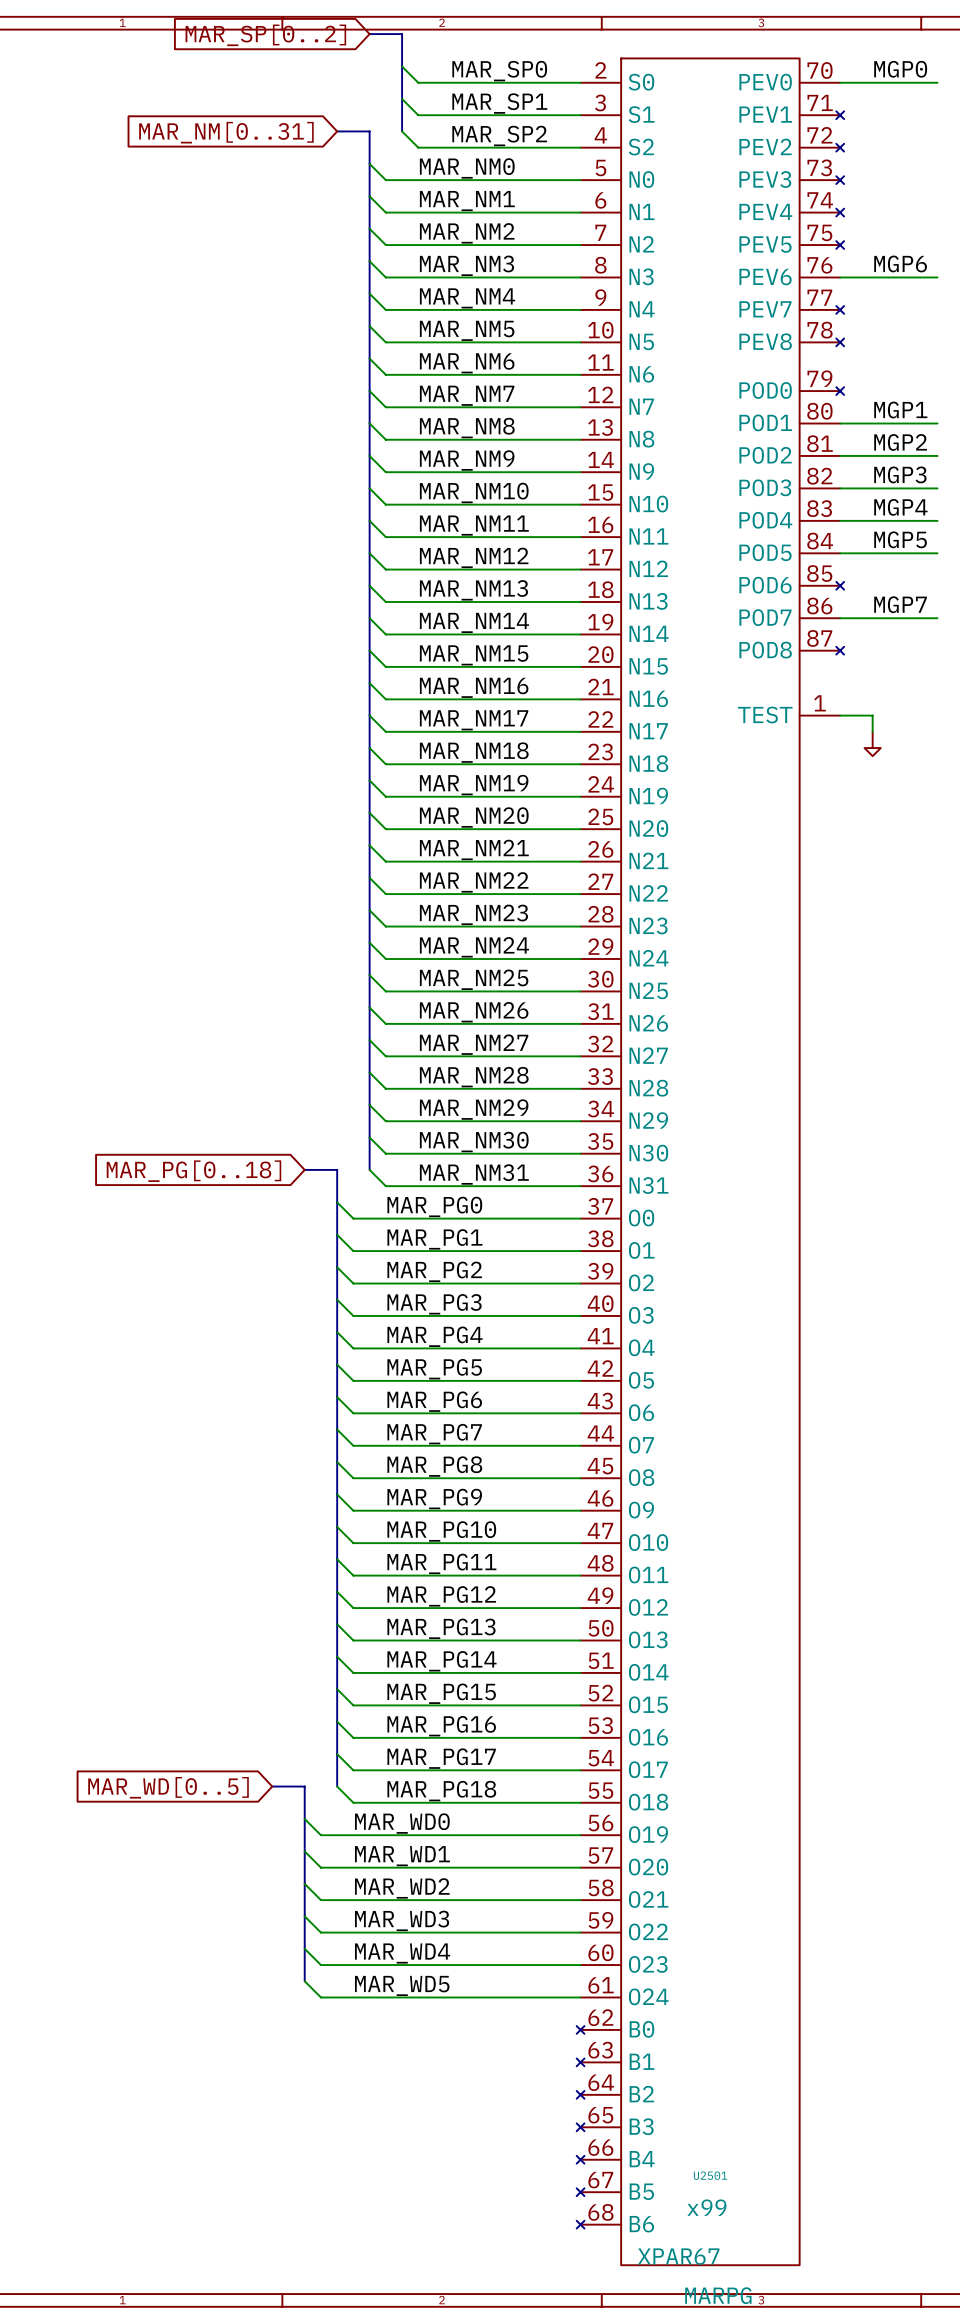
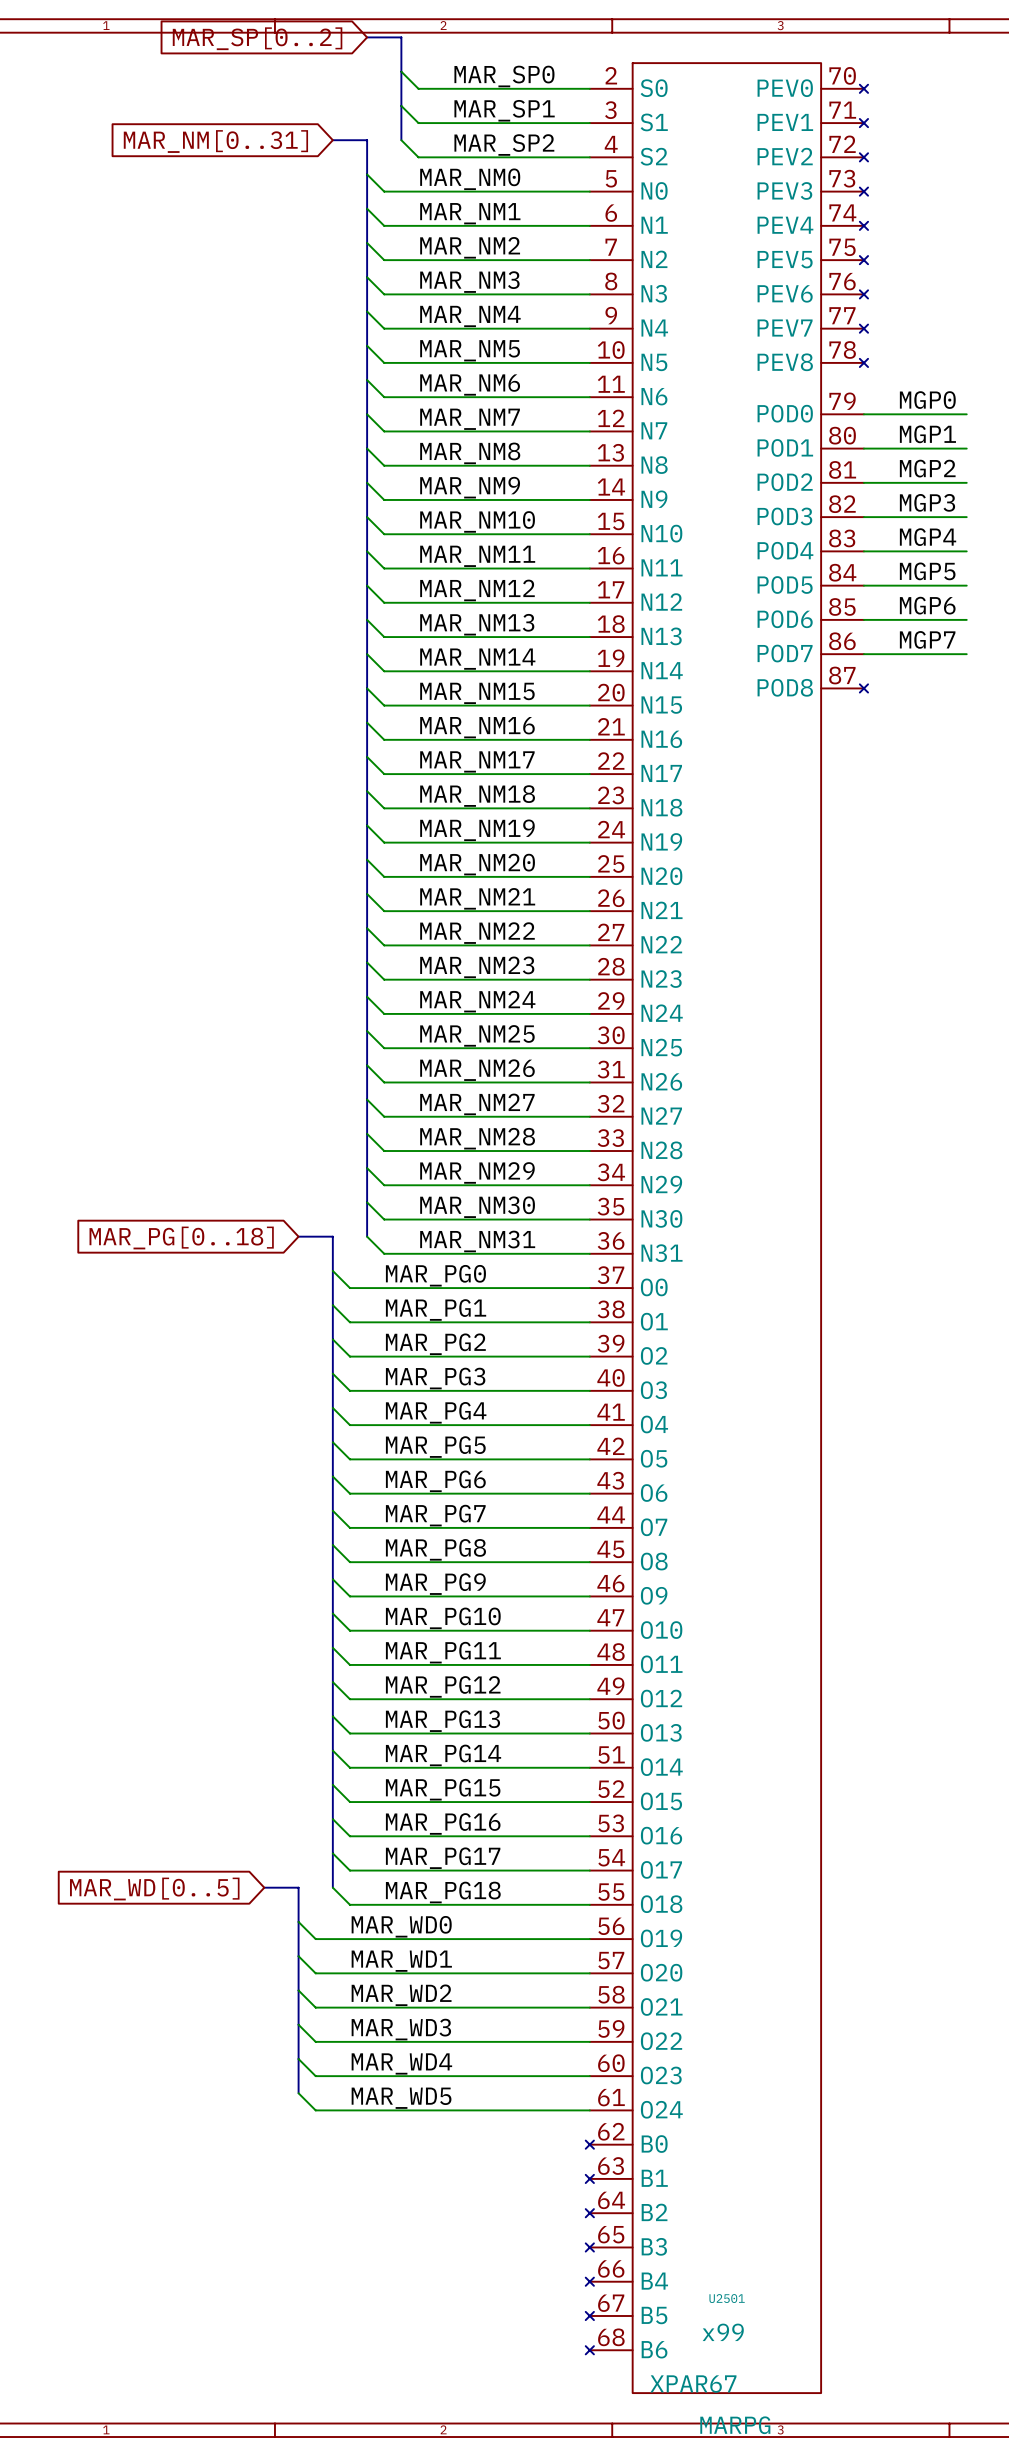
U2501 symbol: [580, 58, 841, 2266] -> [589, 63, 864, 2394]
label: MGP0 (900, 69) -> none
wire: (840, 82) (937, 82) -> none
no-connect mark: none -> (863, 88)
label: MGP6 (900, 263) -> none
wire: (840, 277) (937, 277) -> (863, 414) (966, 414)
no-connect mark: none -> (863, 294)
label: none -> MGP0 (927, 400)
no-connect mark: (840, 391) -> none
label: none -> MGP6 (927, 605)
wire: none -> (863, 619) (966, 619)
no-connect mark: (840, 585) -> none
wire: (840, 715) (872, 715) (872, 731) -> none
power symbol: (872, 744) -> none

